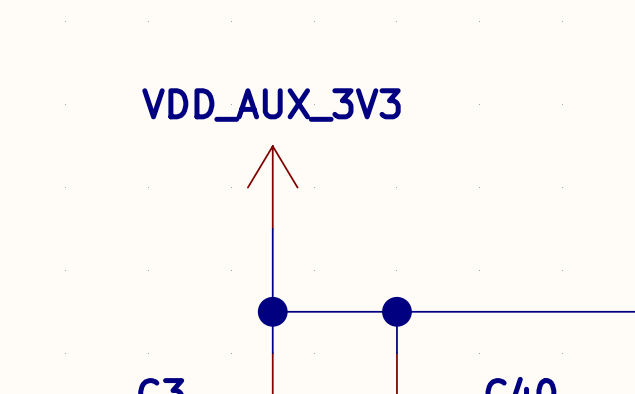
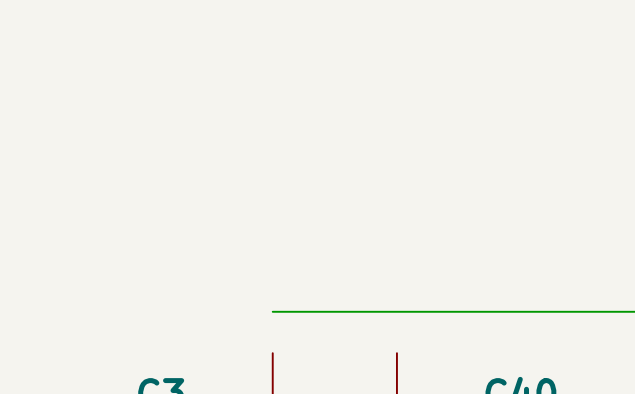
power symbol: VDD_AUX_3V3 (272, 187) -> none
wire: (272, 228) (272, 353) -> none
junction: (272, 311) -> none
wire: (396, 311) (396, 353) -> none
junction: (396, 311) -> none

